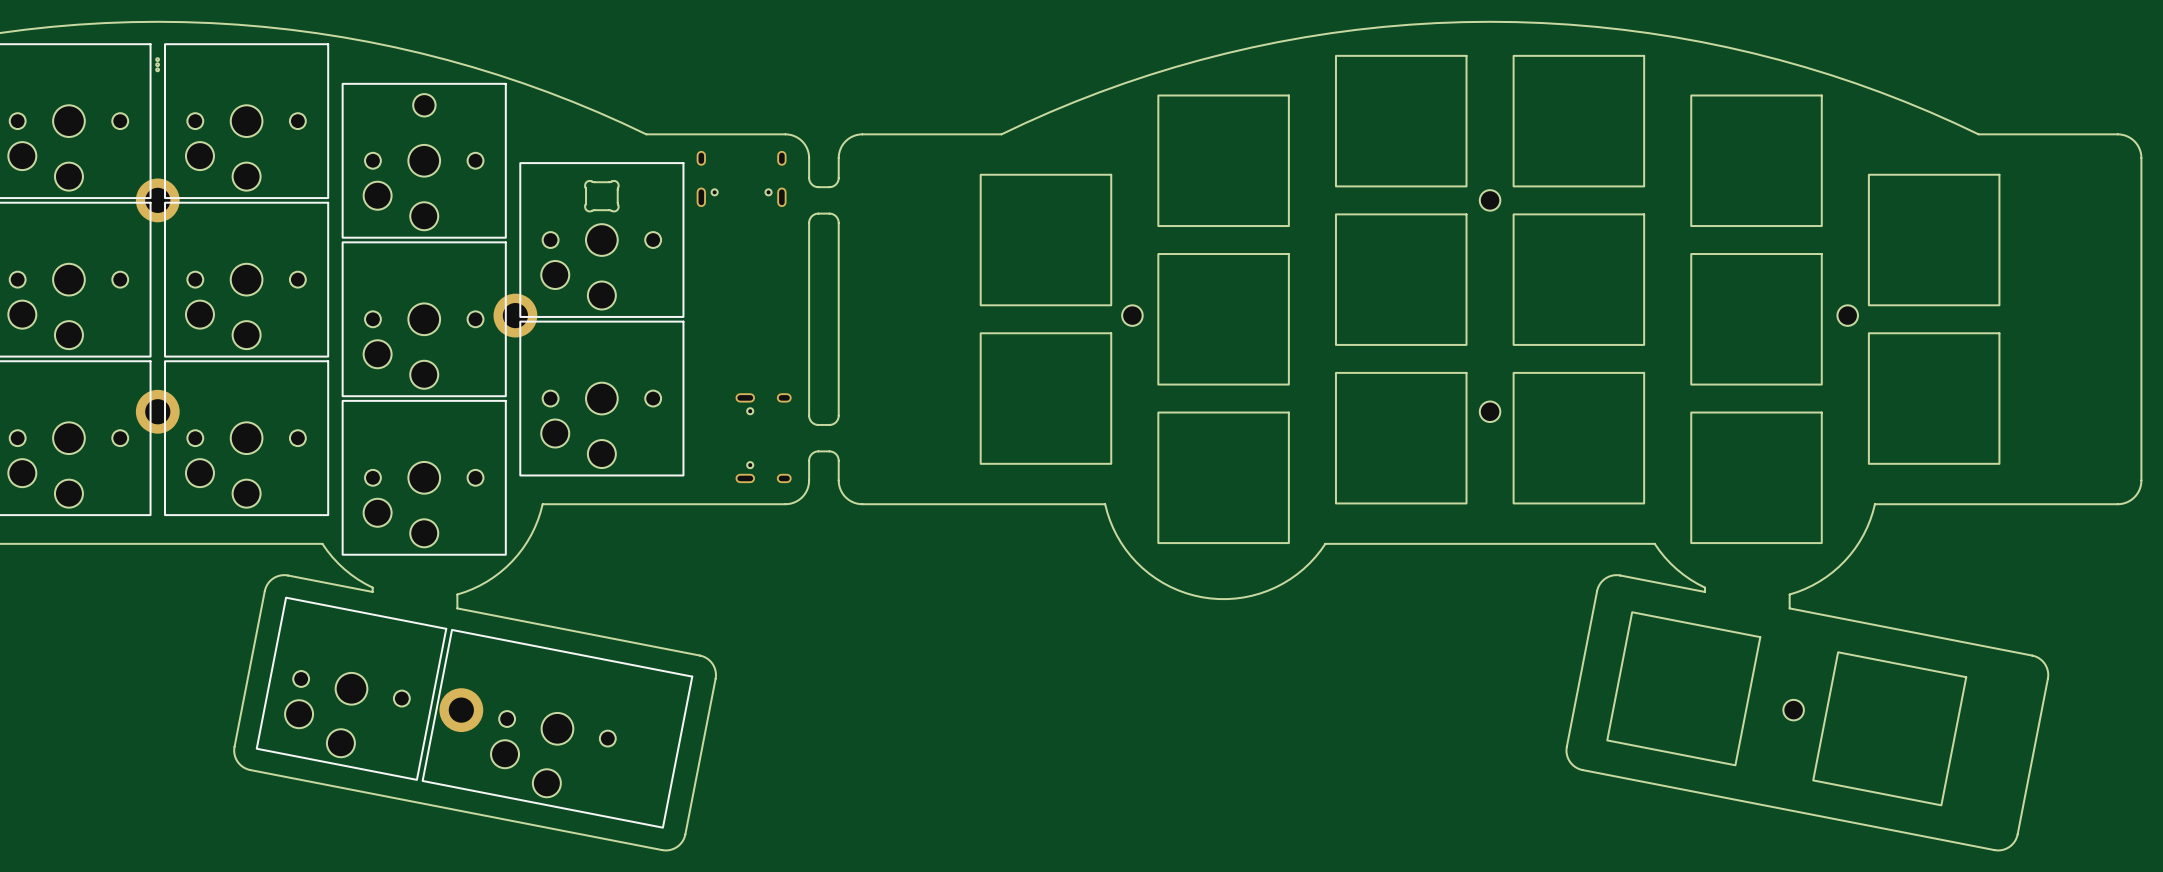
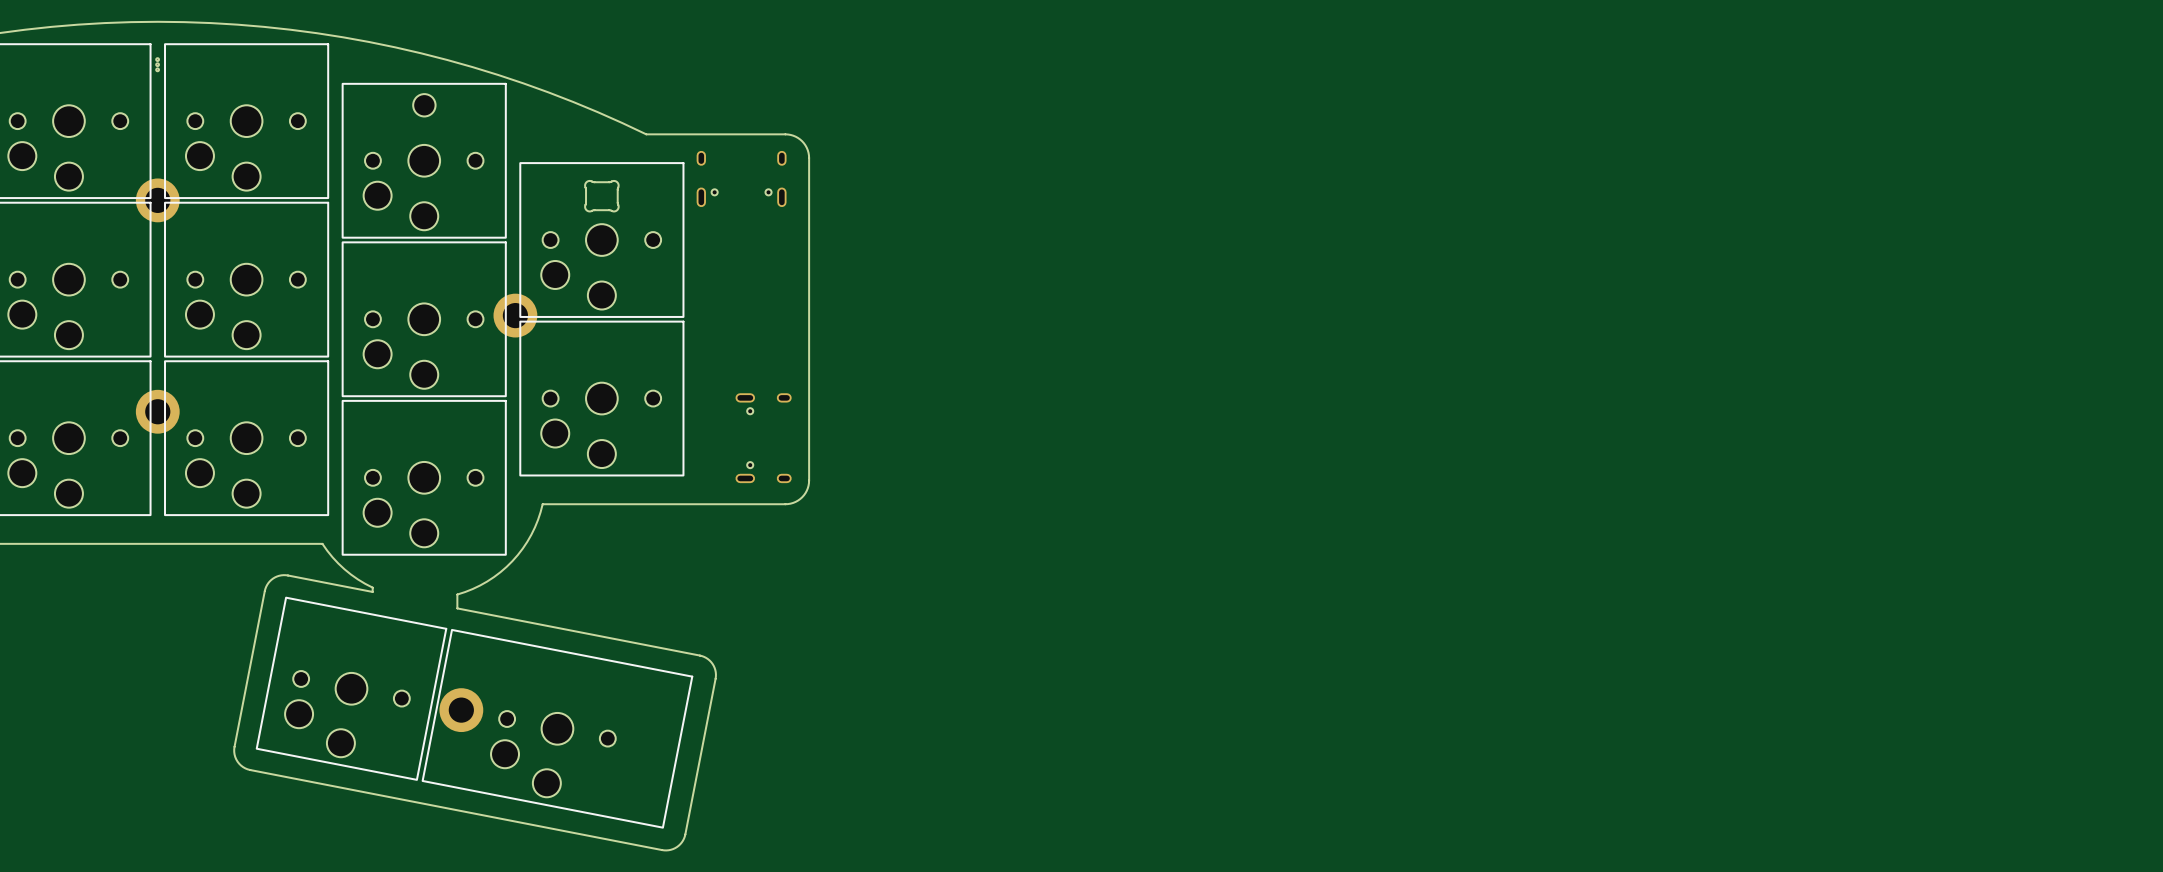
drawing: [1335, 55, 1467, 187] -> none
drawing: [1513, 55, 1645, 187] -> none
drawing: [1158, 95, 1290, 227] -> none
drawing: [1691, 95, 1823, 227] -> none
drawing: [980, 174, 1112, 306] -> none
drawing: [1868, 174, 2000, 306] -> none
board edge: (809, 177) (811, 183) (816, 186) (830, 187) (835, 184) (838, 178) (840, 148) (847, 139) (856, 135) (1001, 134) (1099, 92) (1149, 74) (1226, 53) (1304, 37) (1357, 29) (1463, 22) (1569, 24) (1622, 29) (1701, 42) (1753, 53) (1830, 74) (1905, 102) (1978, 134) (2120, 134) (2134, 141) (2140, 150) (2141, 158) (2141, 480) (2136, 495) (2127, 501) (2117, 504) (1874, 504) (1863, 534) (1844, 561) (1819, 581) (1789, 594) (1789, 608) (2032, 655) (2043, 662) (2047, 669) (2047, 678) (2017, 834) (2012, 844) (2003, 849) (1994, 850) (1582, 770) (1573, 765) (1567, 757) (1566, 746) (1597, 591) (1600, 583) (1609, 576) (1618, 575) (1704, 591) (1704, 587) (1690, 579) (1670, 563) (1654, 543) (1325, 543) (1303, 569) (1275, 587) (1243, 597) (1210, 598) (1193, 595) (1170, 586) (1142, 568) (1121, 542) (1109, 520) (1105, 504) (859, 504) (847, 499) (841, 490) (838, 483) (838, 459) (835, 453) (816, 451) (811, 454) (809, 460) -> (809, 415) (809, 460)
part: (1490, 200) -> none
drawing: [1335, 214, 1467, 346] -> none
drawing: [1513, 214, 1645, 346] -> none
board edge: (809, 222) (811, 216) (818, 213) (833, 214) (838, 222) (838, 416) (832, 424) (818, 424) (811, 422) (809, 415) -> (809, 222) (809, 177)
drawing: [1158, 253, 1290, 385] -> none
drawing: [1691, 253, 1823, 385] -> none
part: (1132, 315) -> none
part: (1847, 315) -> none
drawing: [980, 333, 1112, 465] -> none
drawing: [1868, 333, 2000, 465] -> none
drawing: [1335, 372, 1467, 504] -> none
drawing: [1513, 372, 1645, 504] -> none
part: (1490, 411) -> none
drawing: [1158, 412, 1290, 544] -> none
drawing: [1691, 412, 1823, 544] -> none
drawing: [1607, 612, 1761, 766] -> none
drawing: [1812, 652, 1967, 806] -> none
part: (1793, 710) -> none

